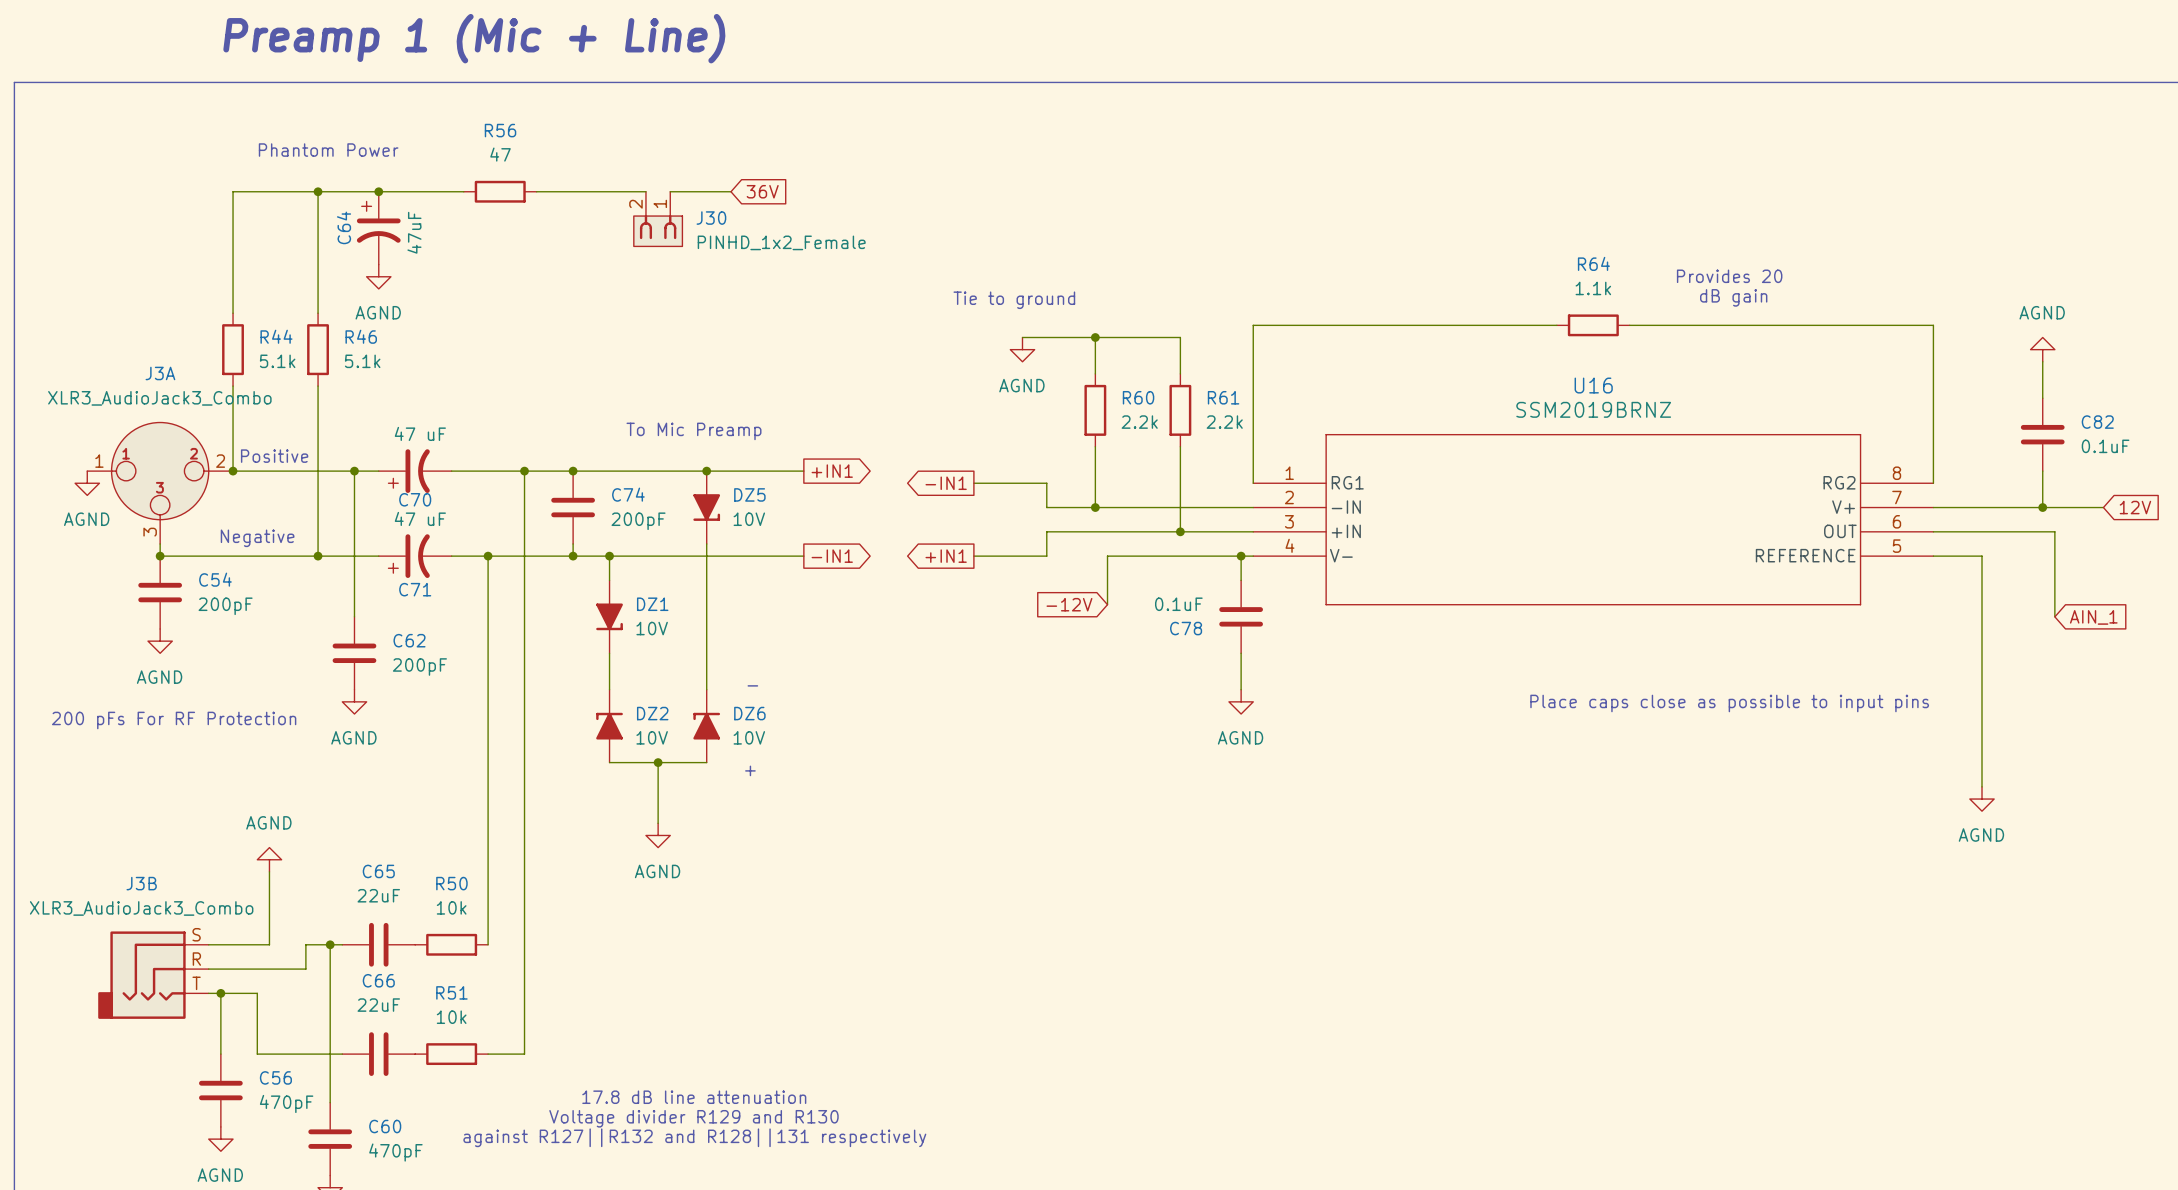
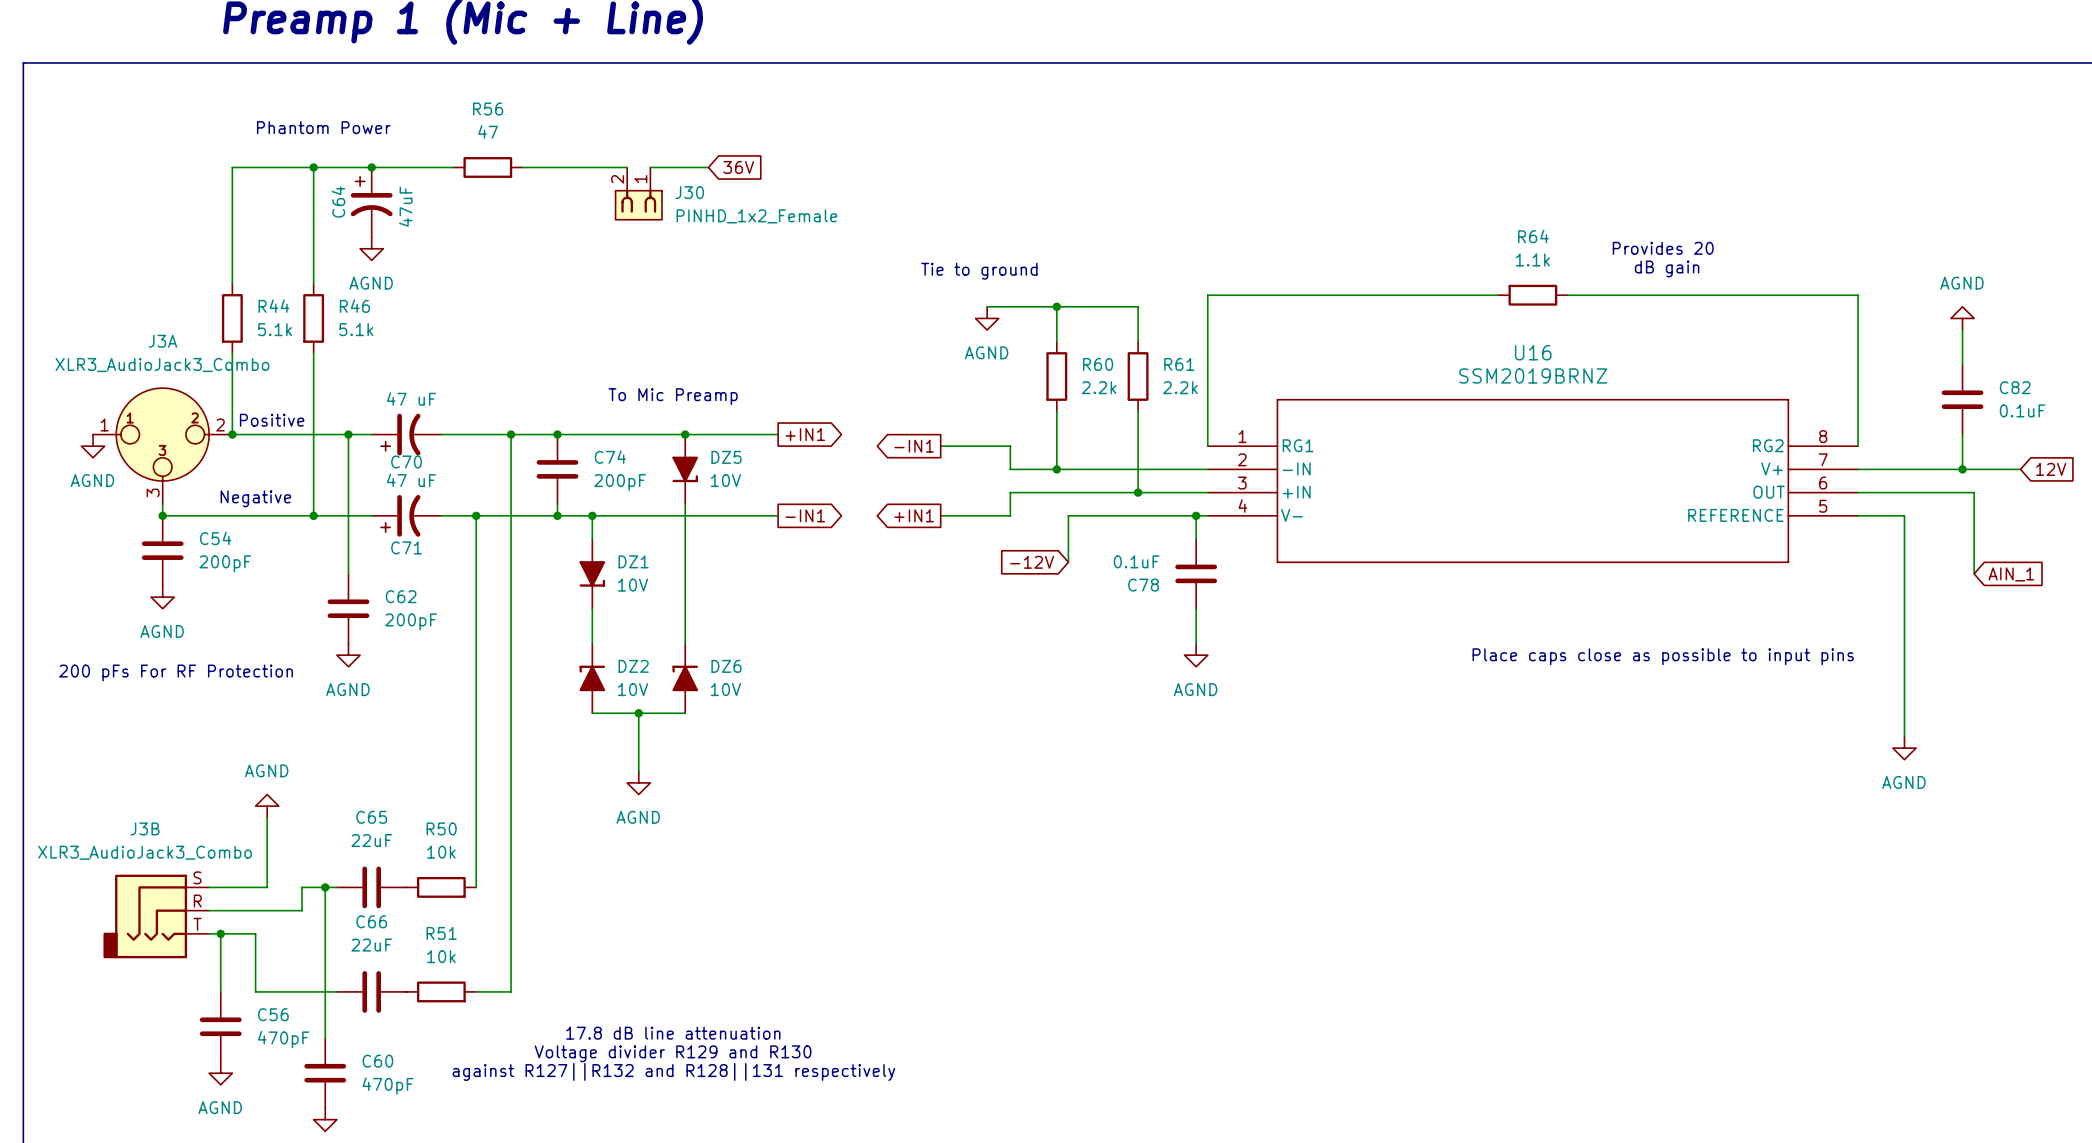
text: - (752, 685) -> none
text: + (750, 770) -> none

